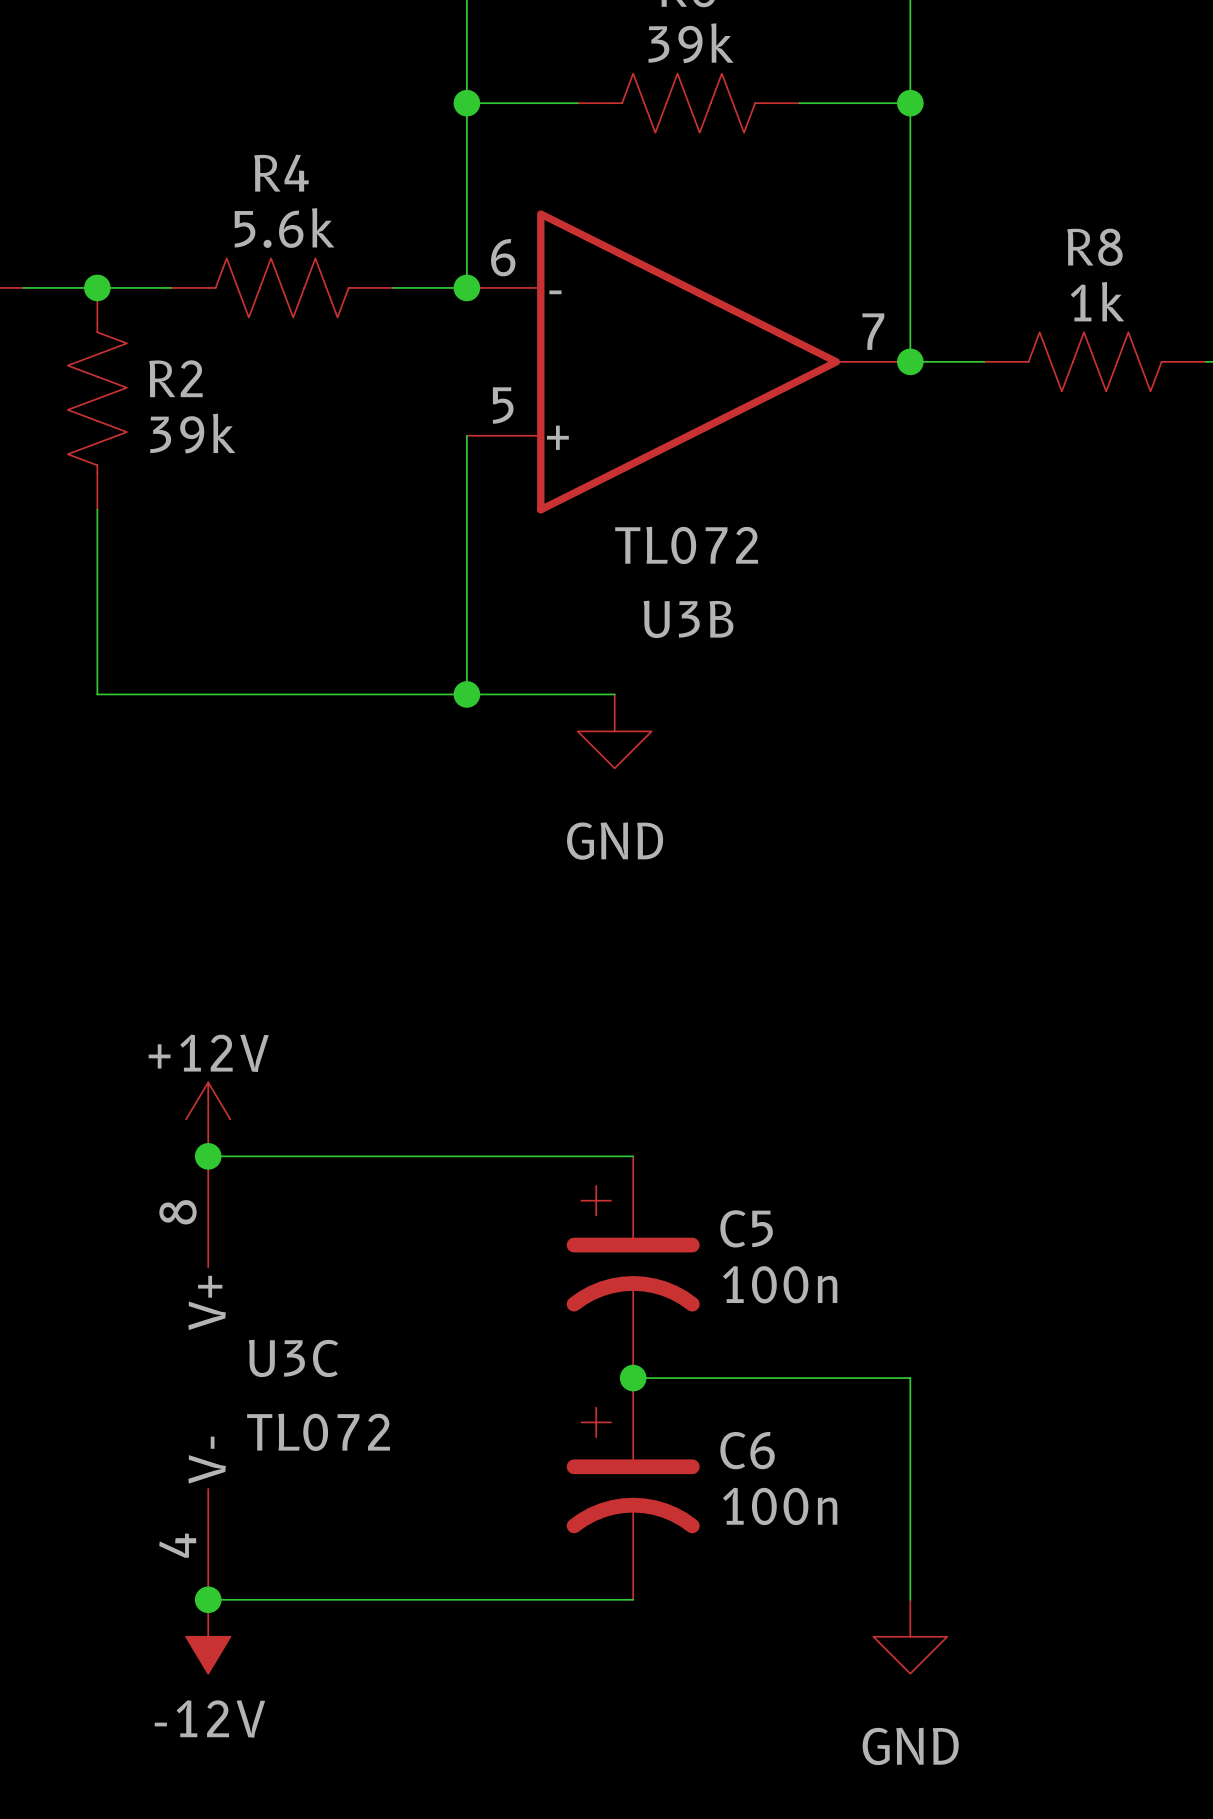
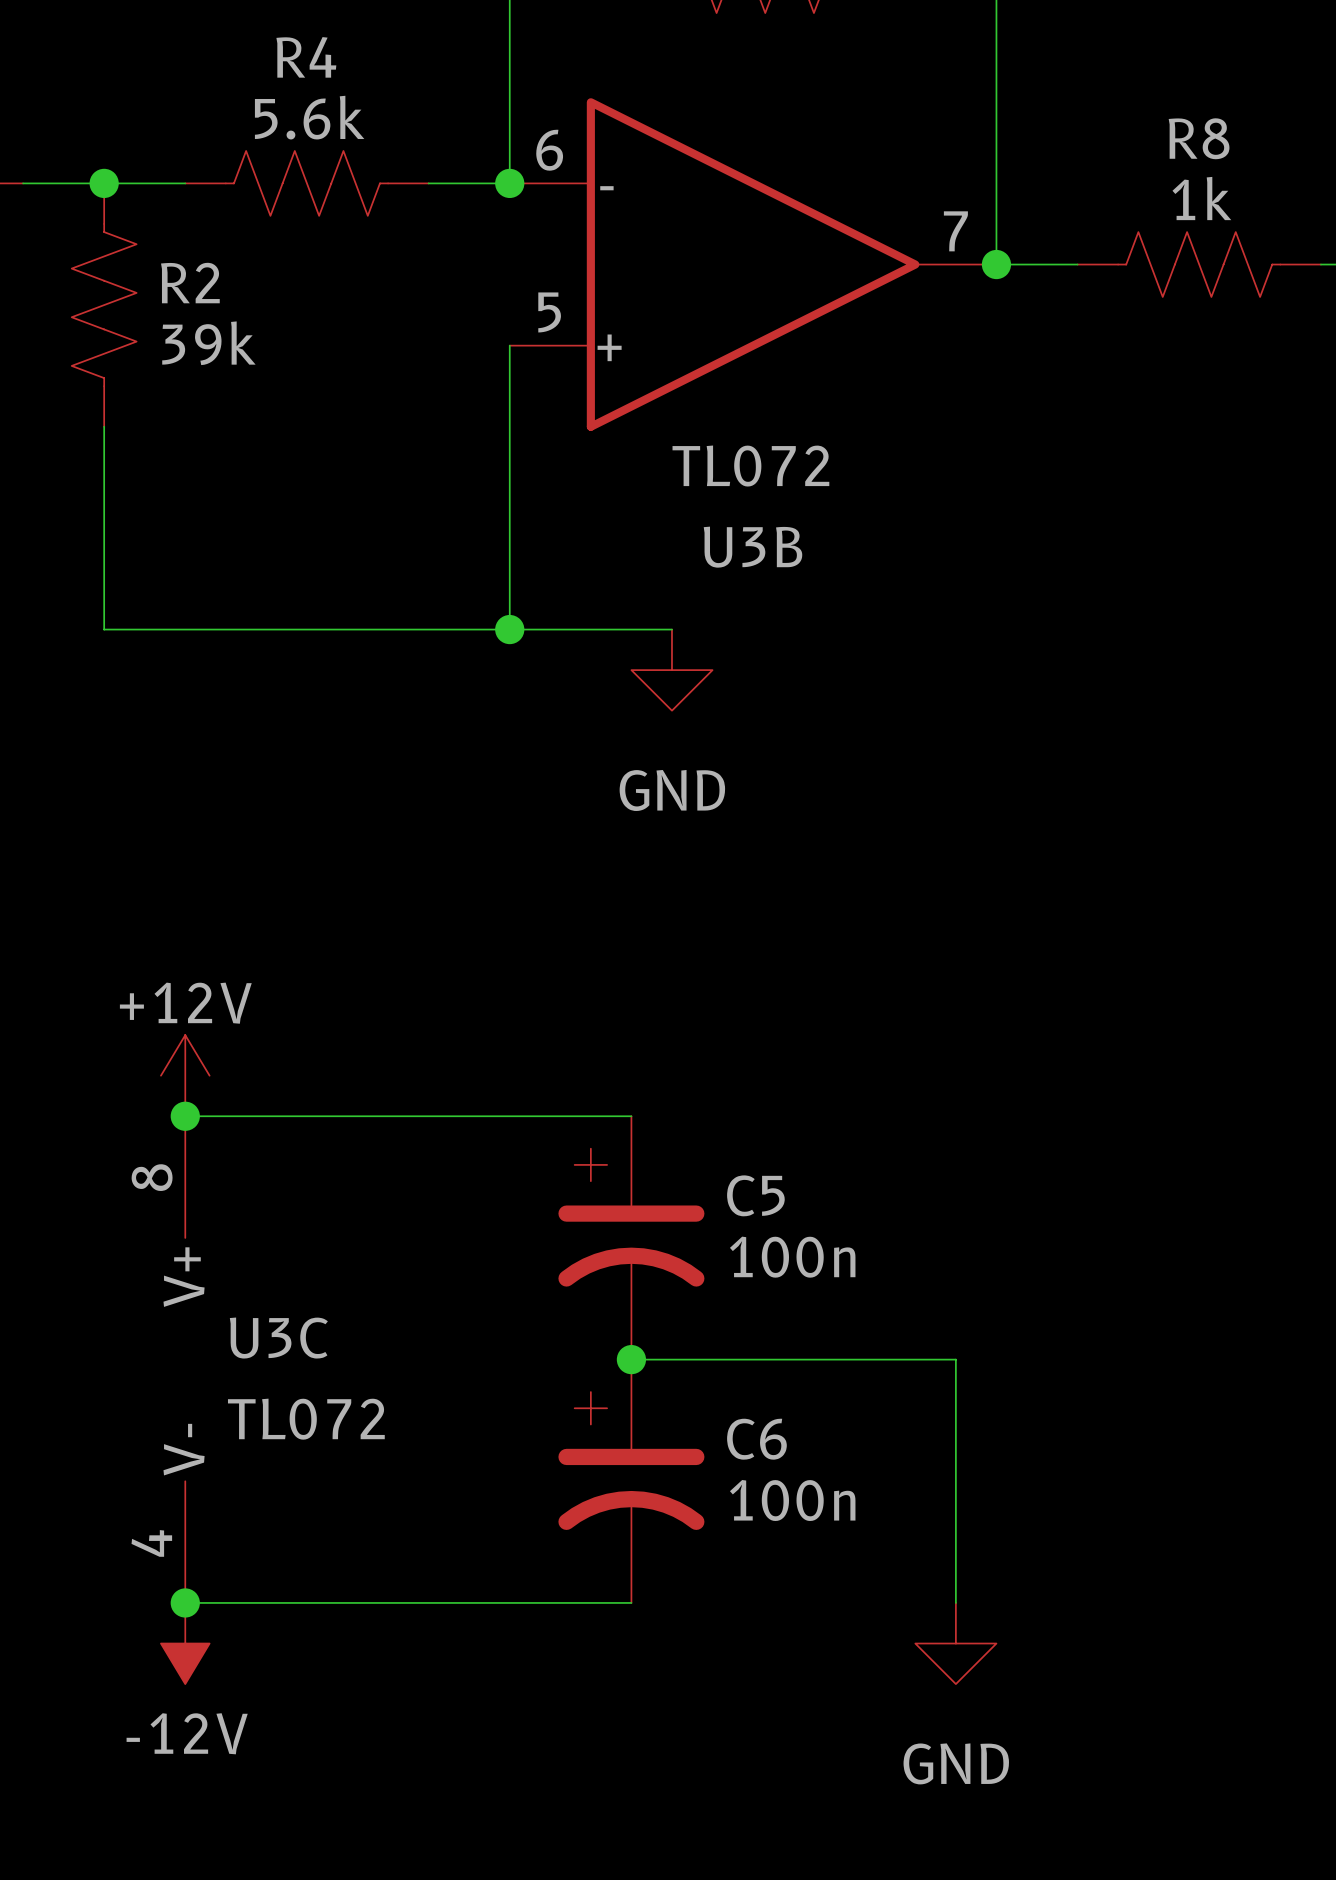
power symbol position: +12V (208, 1119) -> +12V (185, 1075)
wire: none -> (185, 1116) (631, 1116)
wire: (208, 1156) (633, 1156) -> none
junction position: (208, 1156) -> (185, 1116)
C5 position: (633, 1267) -> (631, 1237)
wire: none -> (631, 1359) (955, 1359) (955, 1602)
U3C position: (208, 1378) -> (185, 1359)
wire: (633, 1378) (910, 1378) (910, 1599) -> none
junction position: (633, 1378) -> (631, 1359)
C6 position: (633, 1488) -> (631, 1481)
wire: none -> (185, 1602) (631, 1602)
wire: (208, 1599) (633, 1599) -> none
junction position: (208, 1599) -> (185, 1602)
power symbol position: -12V (208, 1636) -> -12V (185, 1643)
power symbol position: GND (910, 1636) -> GND (955, 1643)

